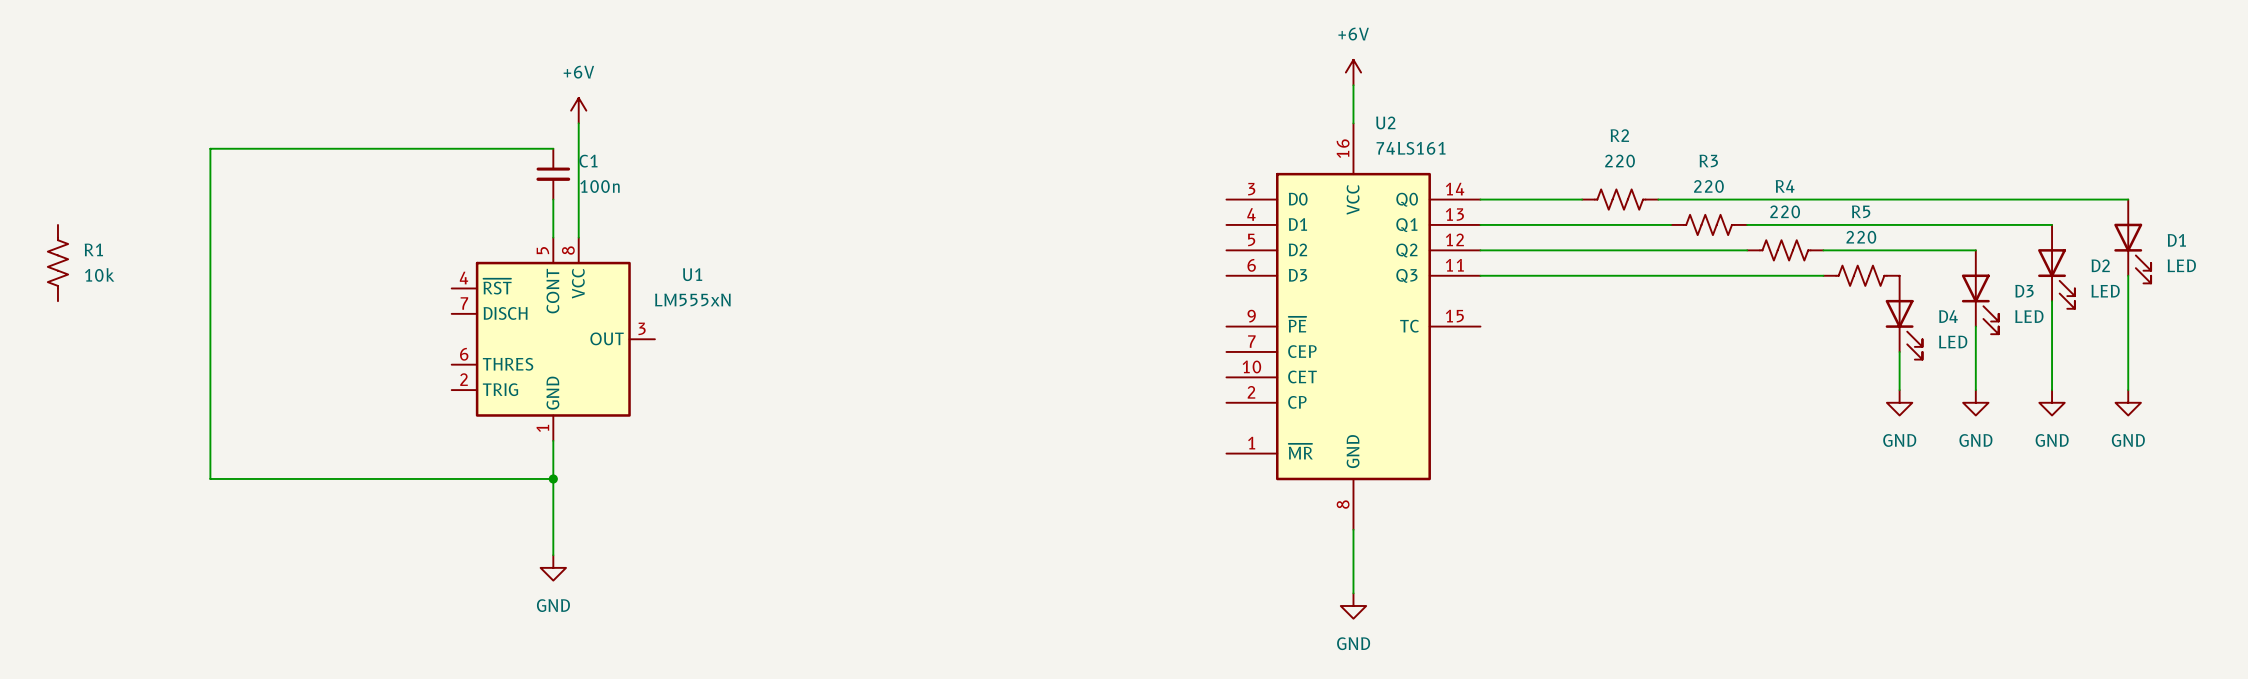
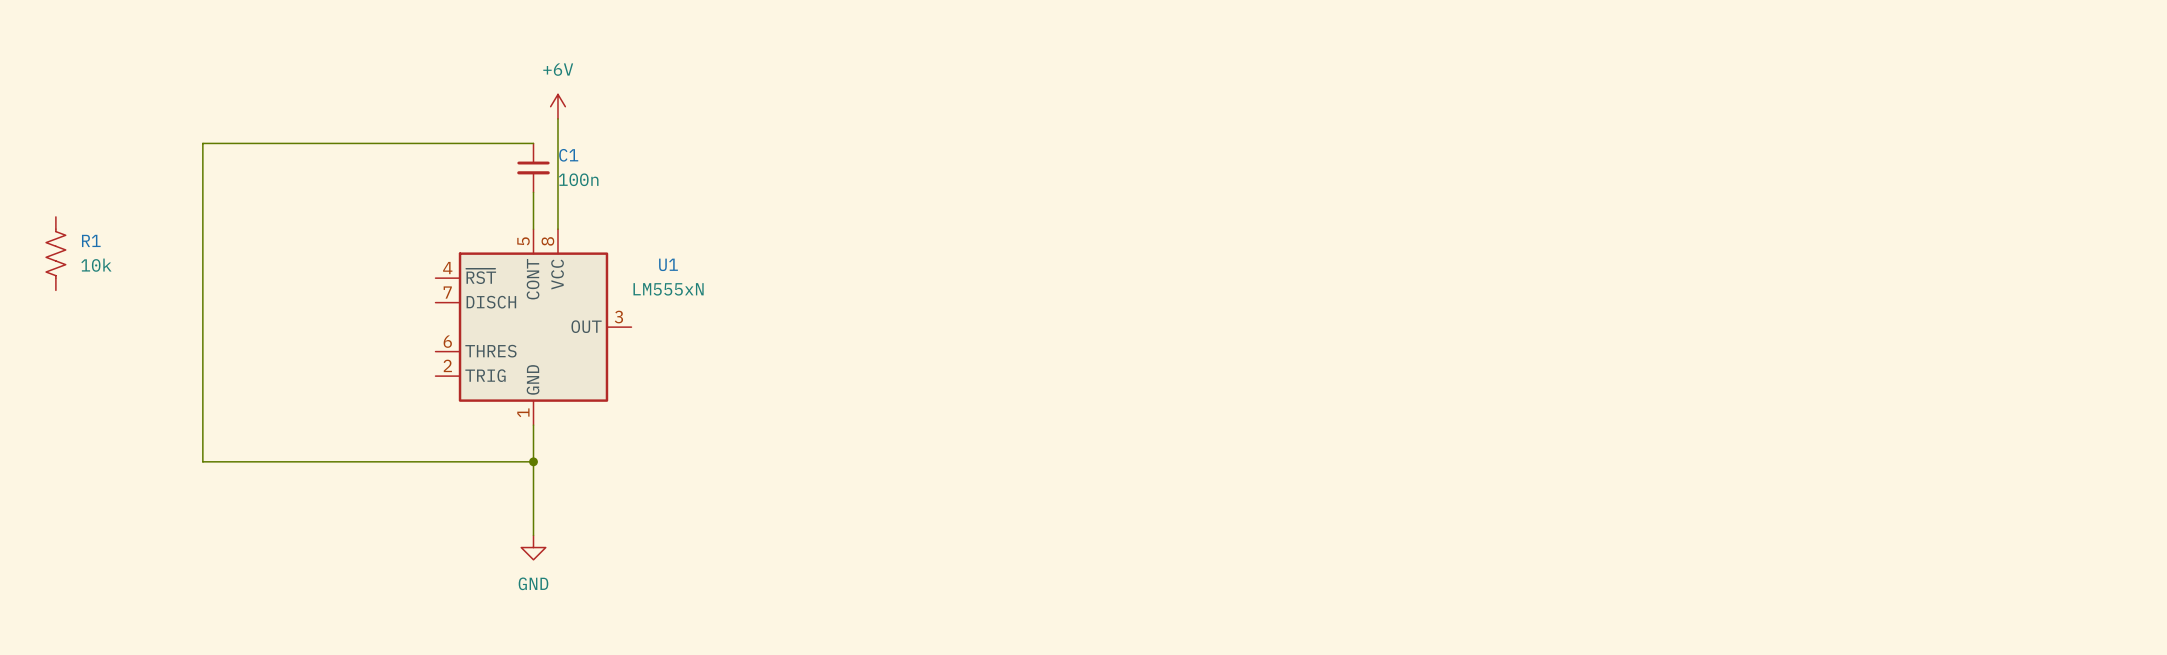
power symbol: +6V (1353, 72) -> none
wire: (1353, 85) (1353, 123) -> none
wire: (1480, 199) (1582, 199) -> none
R2: 220 (1620, 199) -> none
wire: (1658, 199) (2128, 199) -> none
wire: (1480, 224) (1671, 224) -> none
R3: 220 (1709, 224) -> none
wire: (1747, 224) (2052, 224) -> none
D1: LED (2132, 241) -> none
wire: (1480, 250) (1747, 250) -> none
R4: 220 (1785, 250) -> none
wire: (1823, 250) (1975, 250) -> none
D2: LED (2056, 266) -> none
wire: (1480, 275) (1823, 275) -> none
R5: 220 (1861, 275) -> none
wire: (2128, 275) (2128, 390) -> none
D3: LED (1980, 292) -> none
wire: (2052, 301) (2052, 390) -> none
D4: LED (1904, 317) -> none
U2: 74LS161 (1353, 326) -> none
wire: (1975, 326) (1975, 390) -> none
wire: (1899, 351) (1899, 390) -> none
power symbol: GND (1899, 402) -> none
power symbol: GND (1975, 402) -> none
power symbol: GND (2052, 402) -> none
power symbol: GND (2128, 402) -> none
wire: (1353, 529) (1353, 593) -> none
power symbol: GND (1353, 605) -> none

